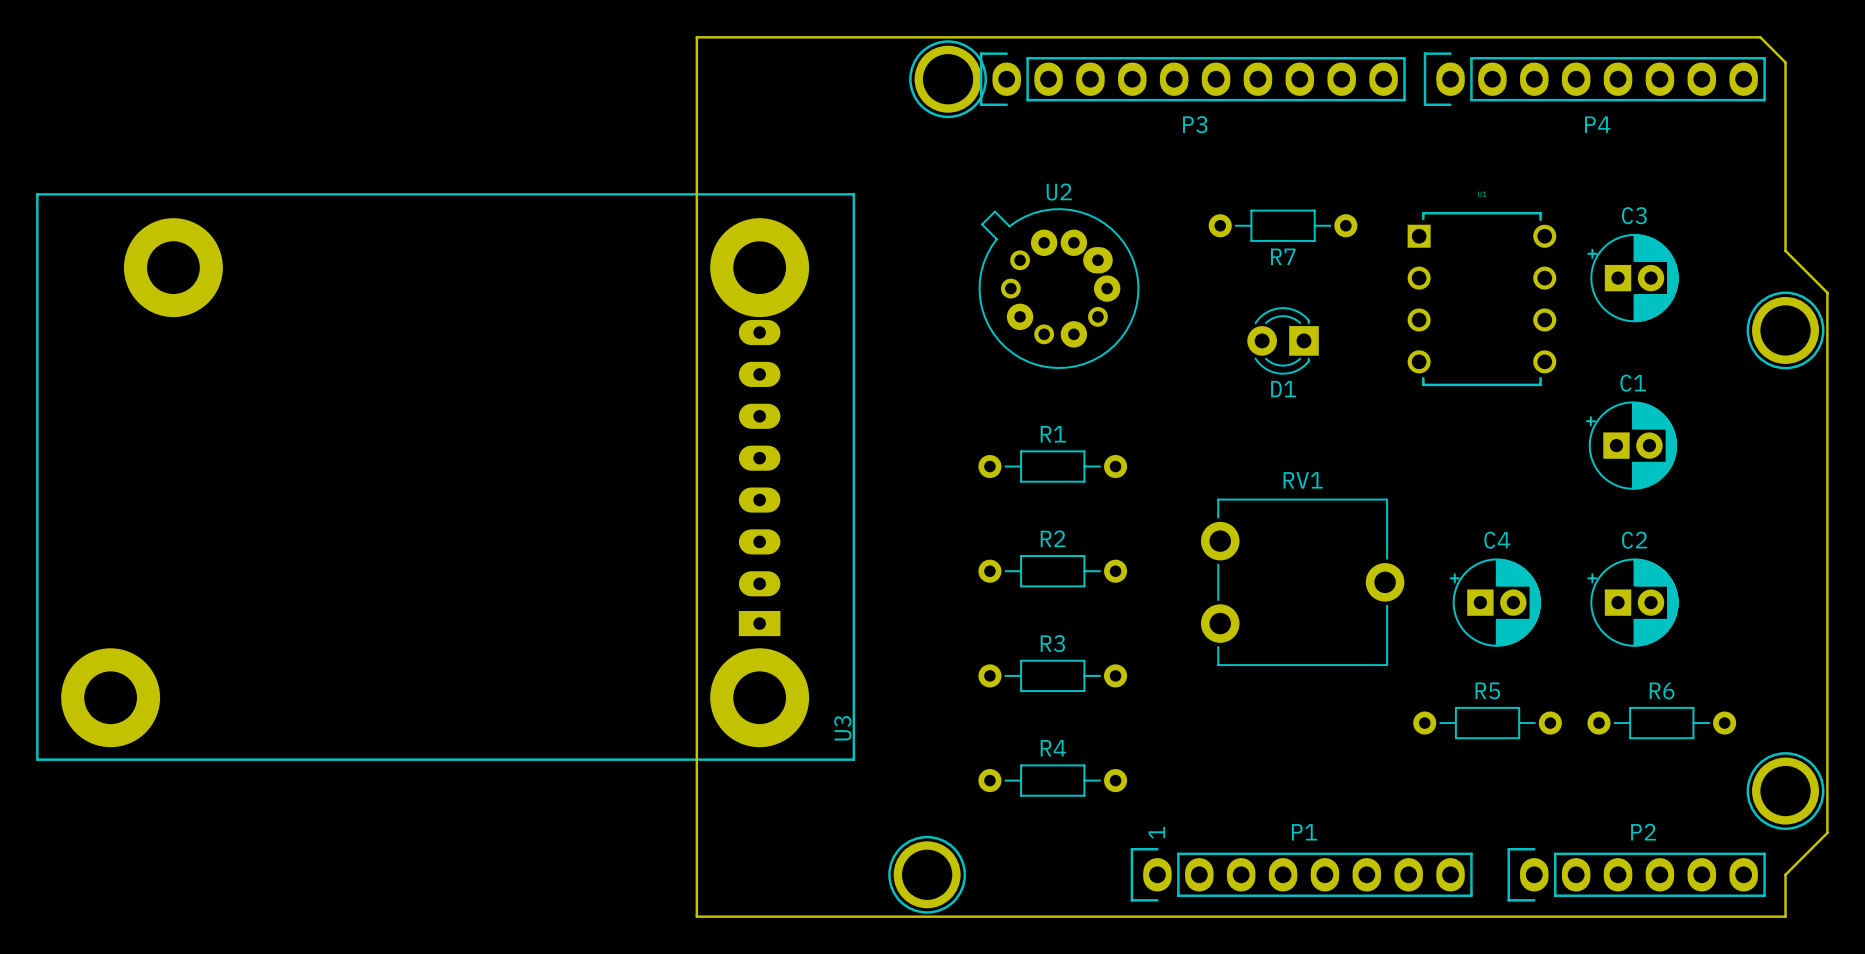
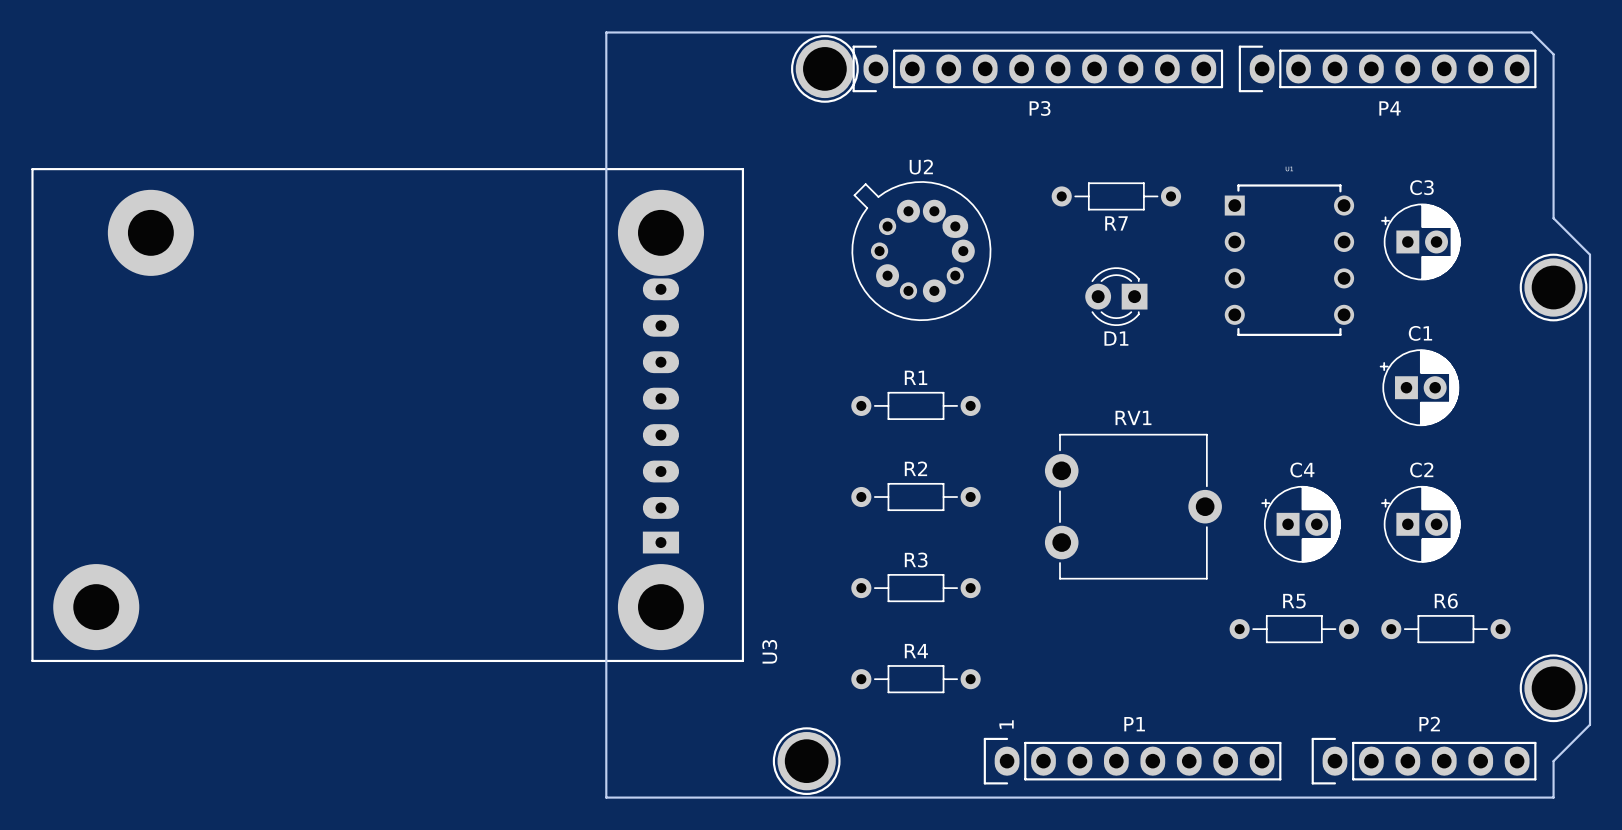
U3 name position: U3 (842, 728) -> U3 (769, 651)

